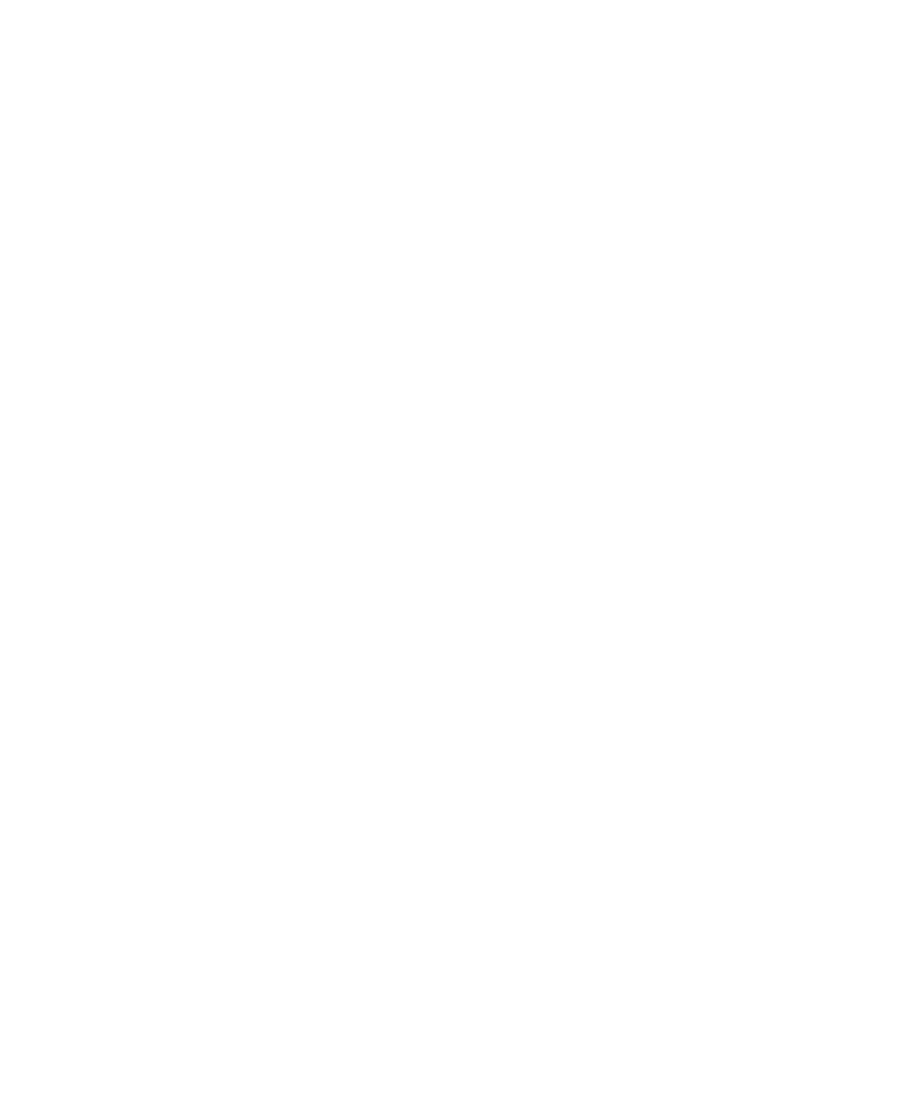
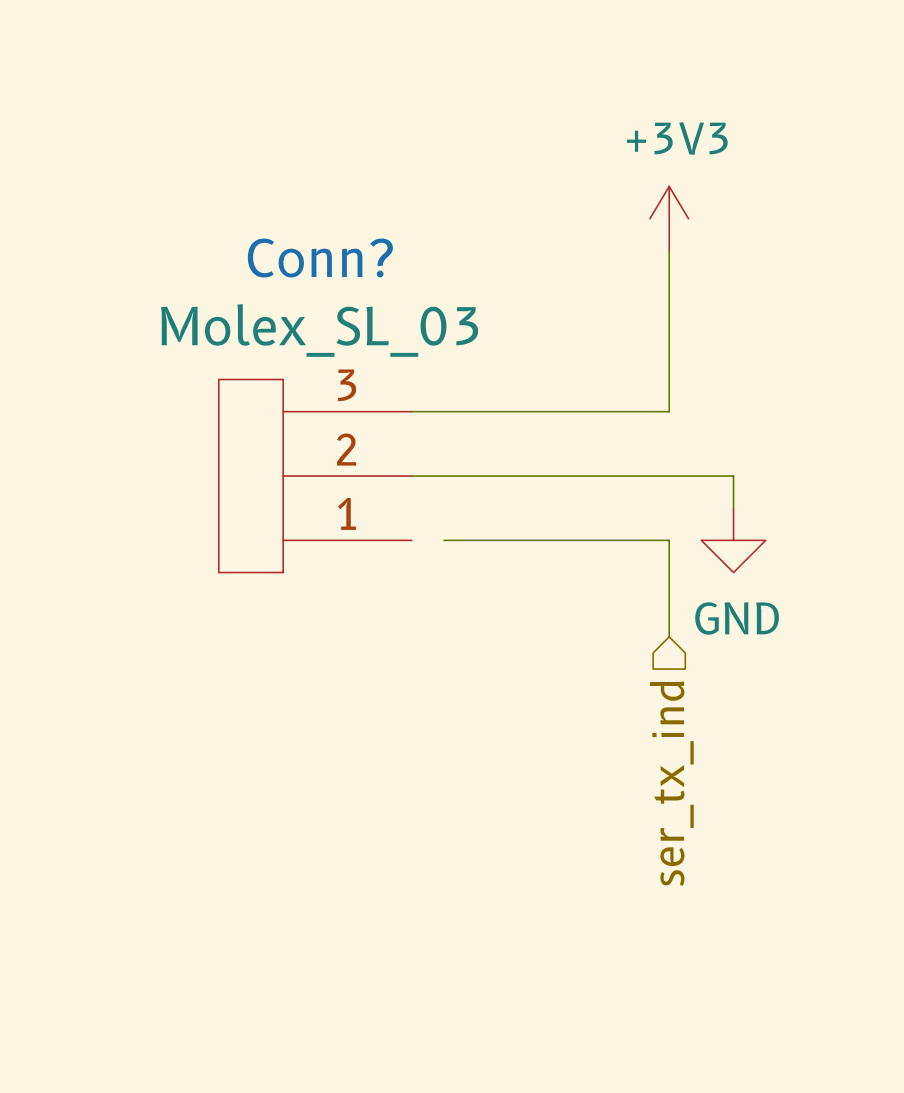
power symbol: none -> +3V3 (669, 218)
wire: none -> (669, 250) (669, 411) (411, 411)
Conn?: none -> Molex_SL_03 (315, 476)
wire: none -> (411, 476) (733, 476) (733, 508)
wire: none -> (444, 540) (669, 540) (669, 636)
power symbol: none -> GND (733, 540)
hierarchical label: none -> ser_tx_ind (671, 783)

